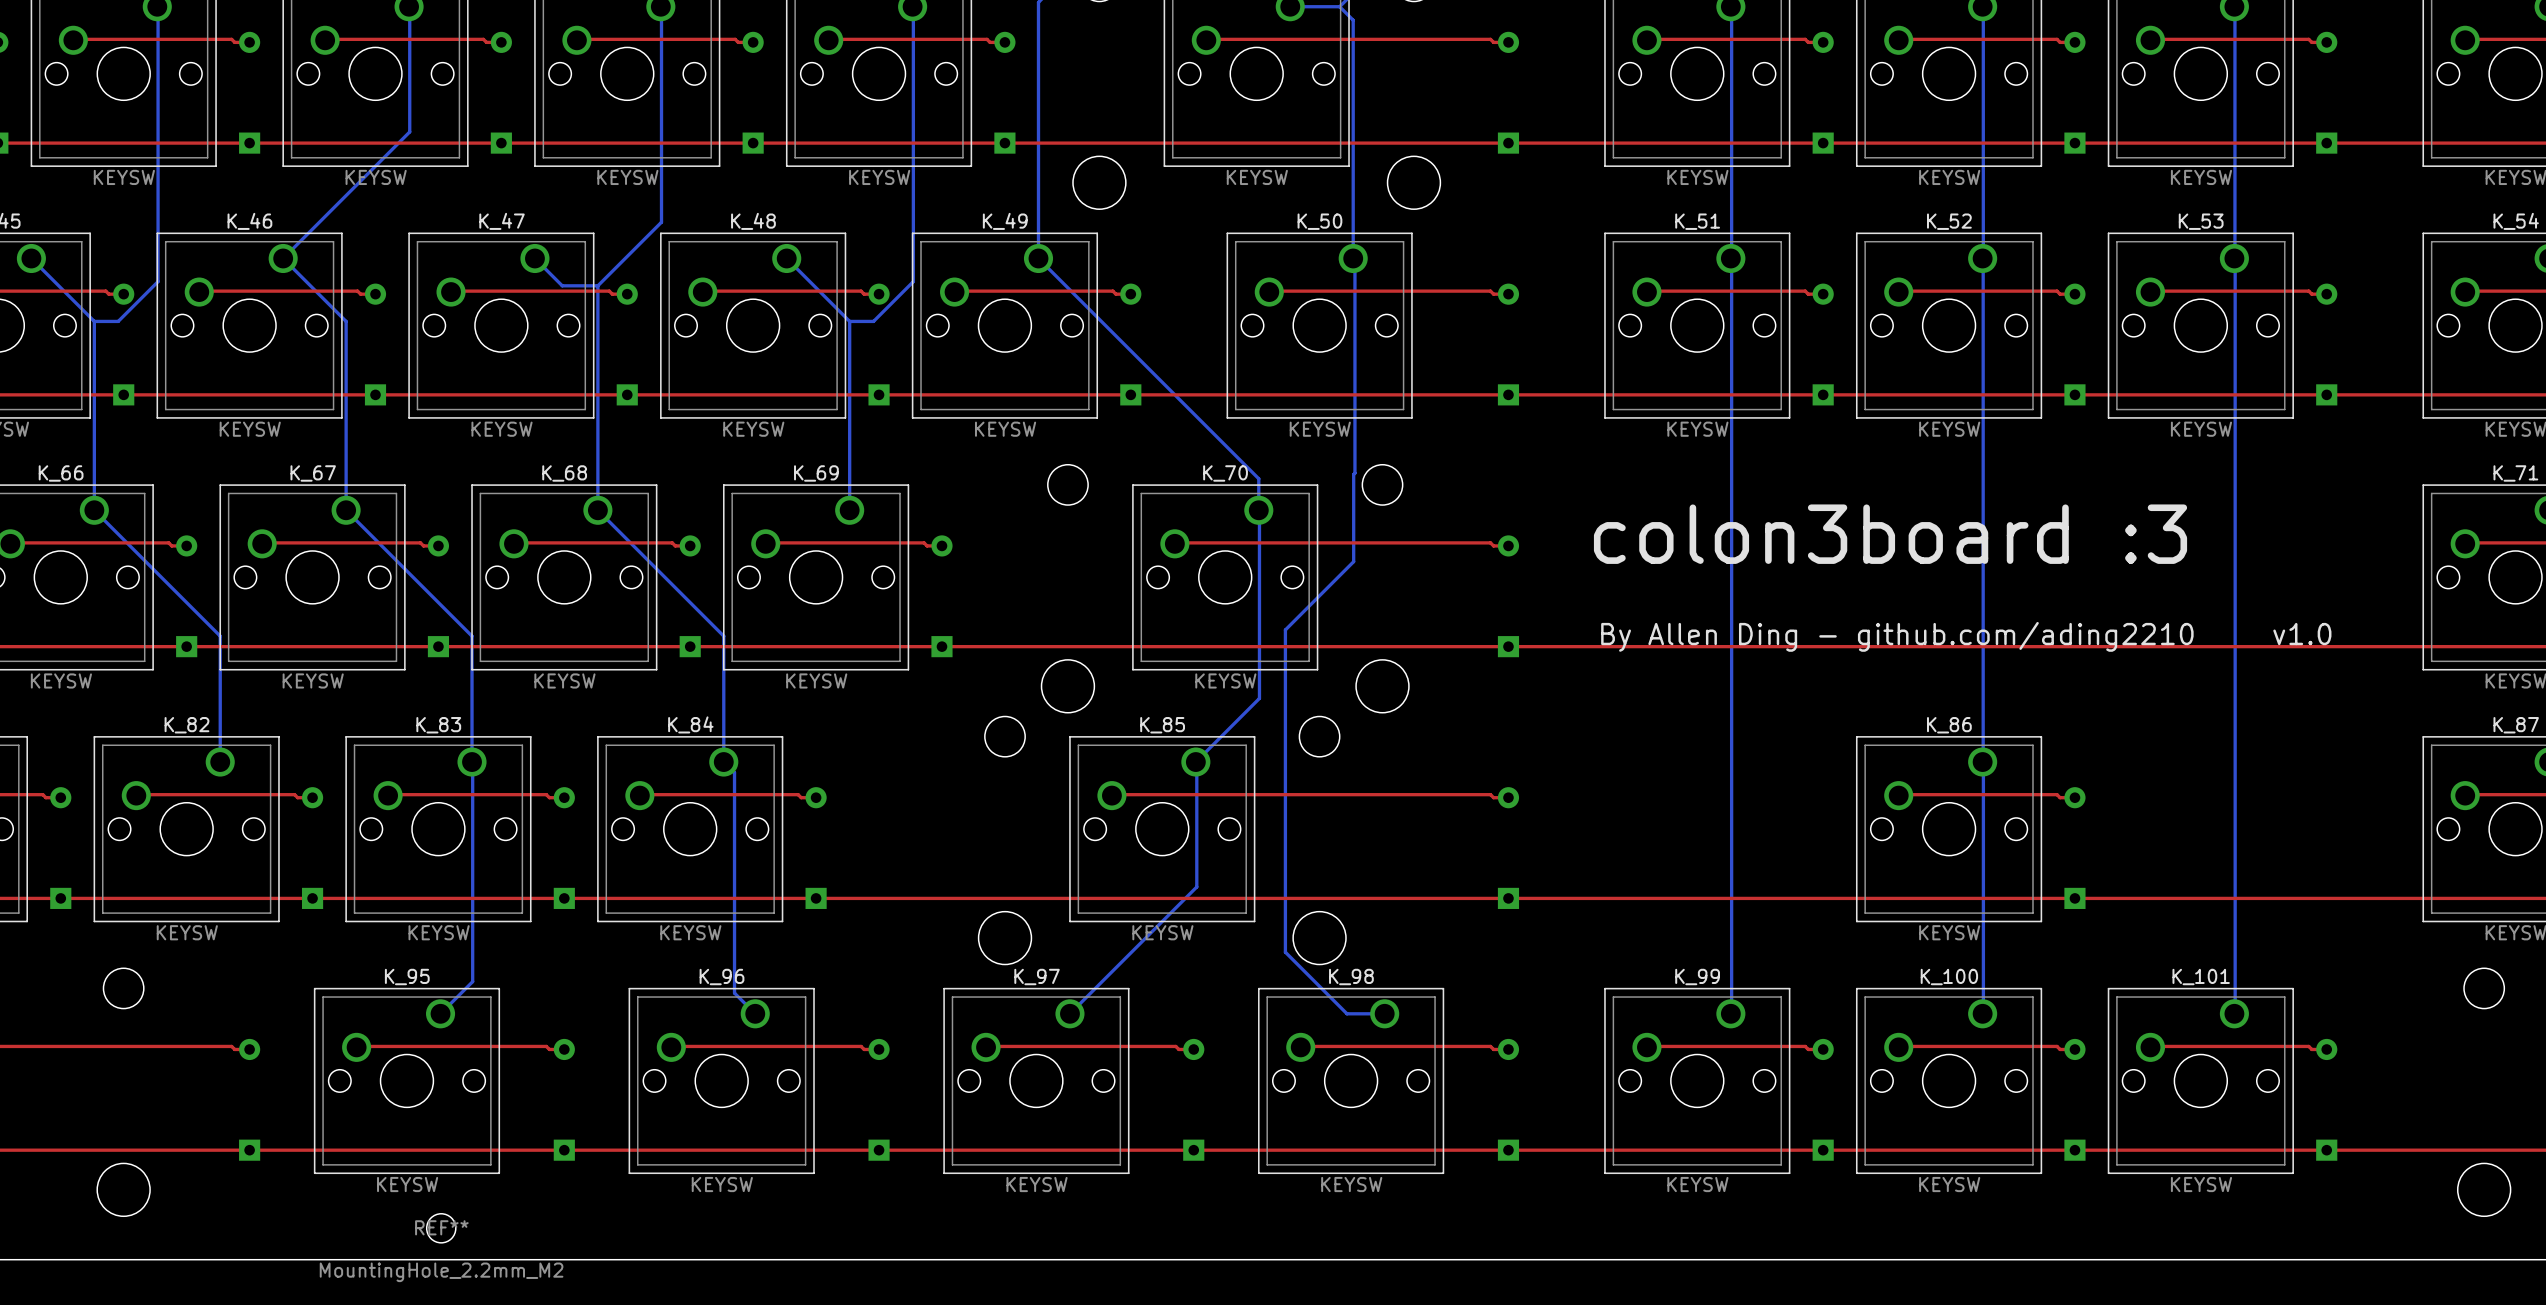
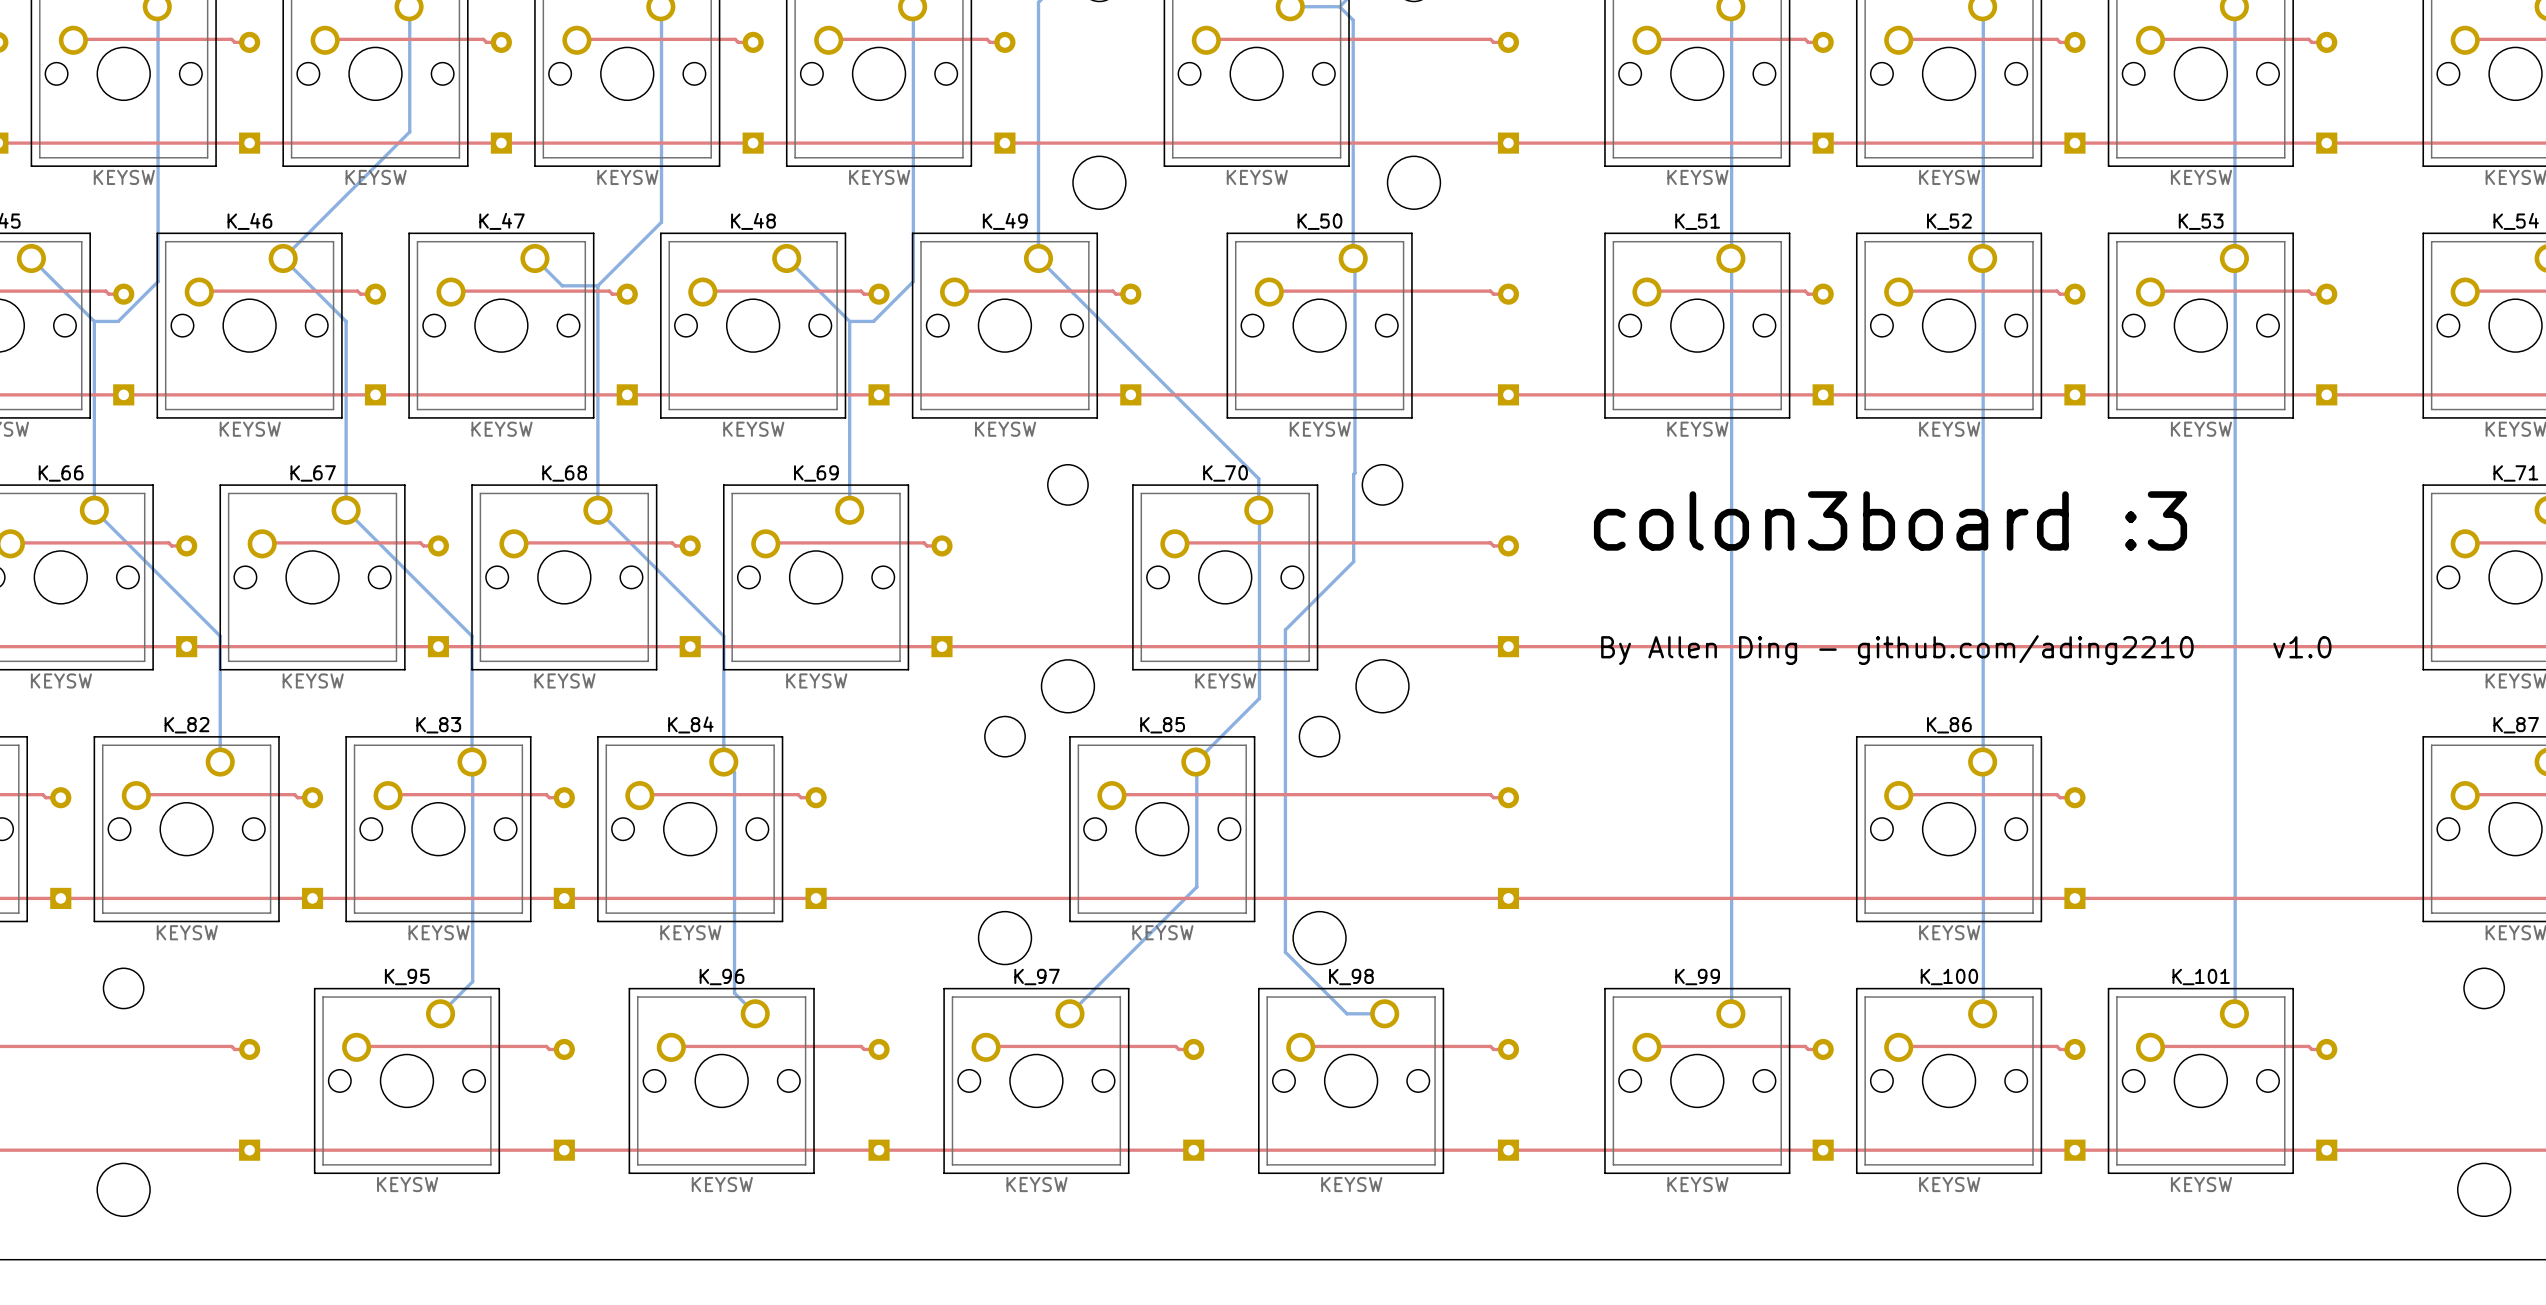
text position: colon3board :3 (1890, 534) -> colon3board :3 (1890, 520)
text position: v1.0 (2302, 634) -> v1.0 (2302, 647)
text position: By Allen Ding - github.com/ading2210 (1897, 636) -> By Allen Ding - github.com/ading2210 (1897, 650)
REF**: MountingHole_2.2mm_M2 (441, 1228) -> none

